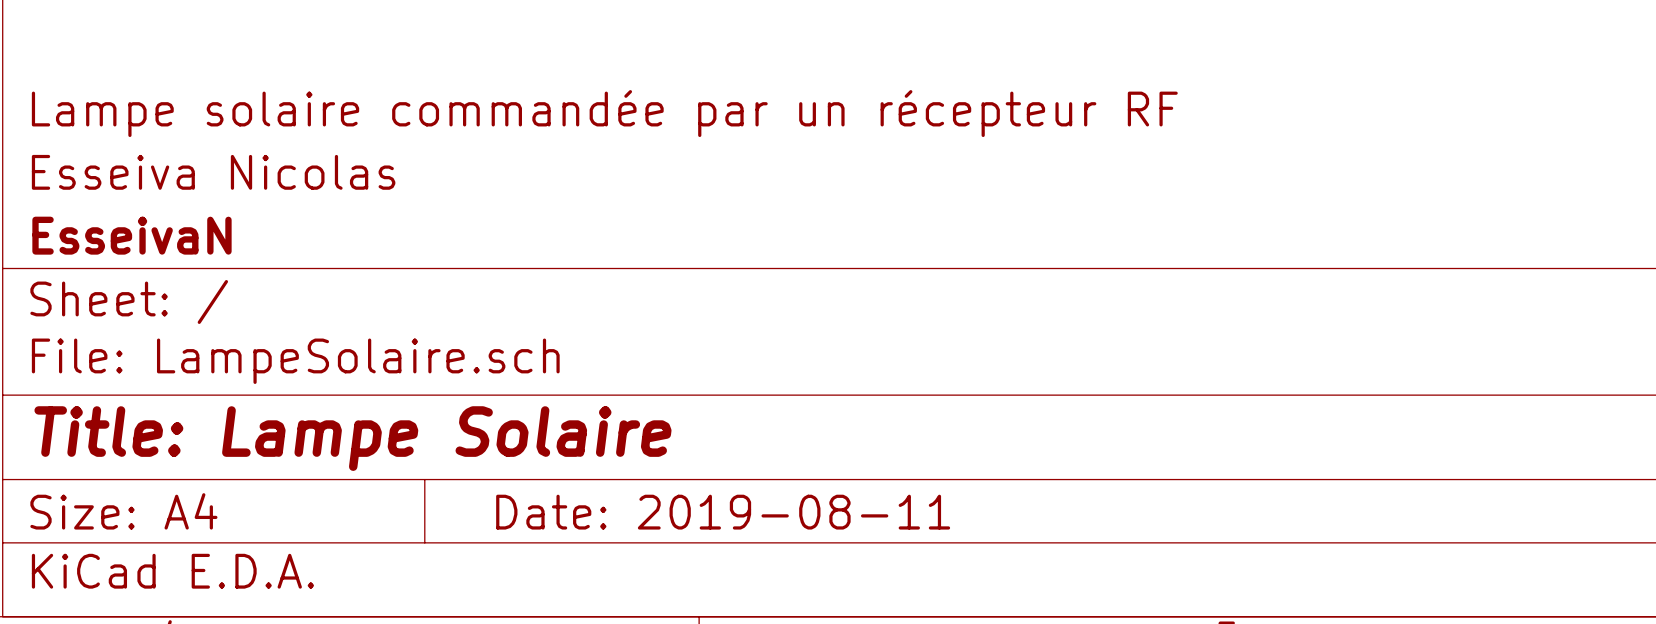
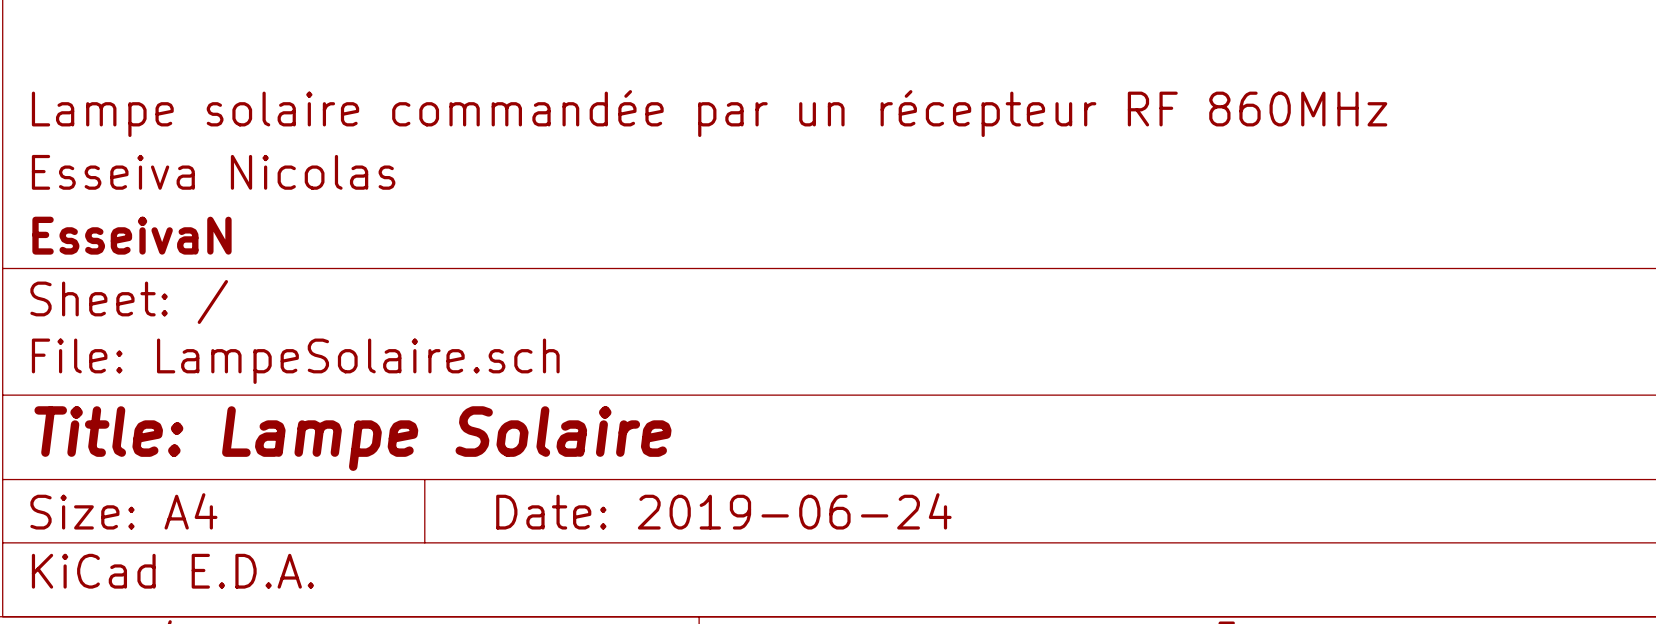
title block: Lampe solaire commandée par un récepteur RF (604, 113) -> Lampe solaire commandée par un récepteur RF 860MHz (709, 113)
title block: Date: 2019-08-11 (723, 512) -> Date: 2019-06-24 (723, 511)

